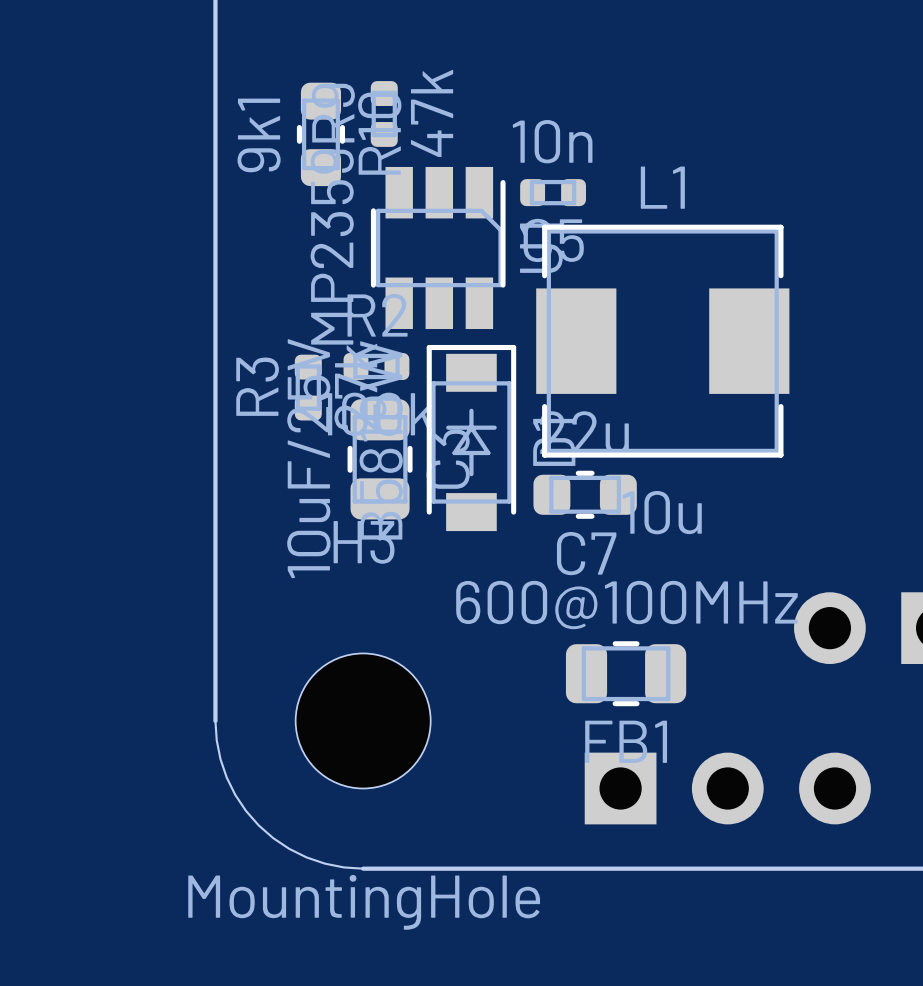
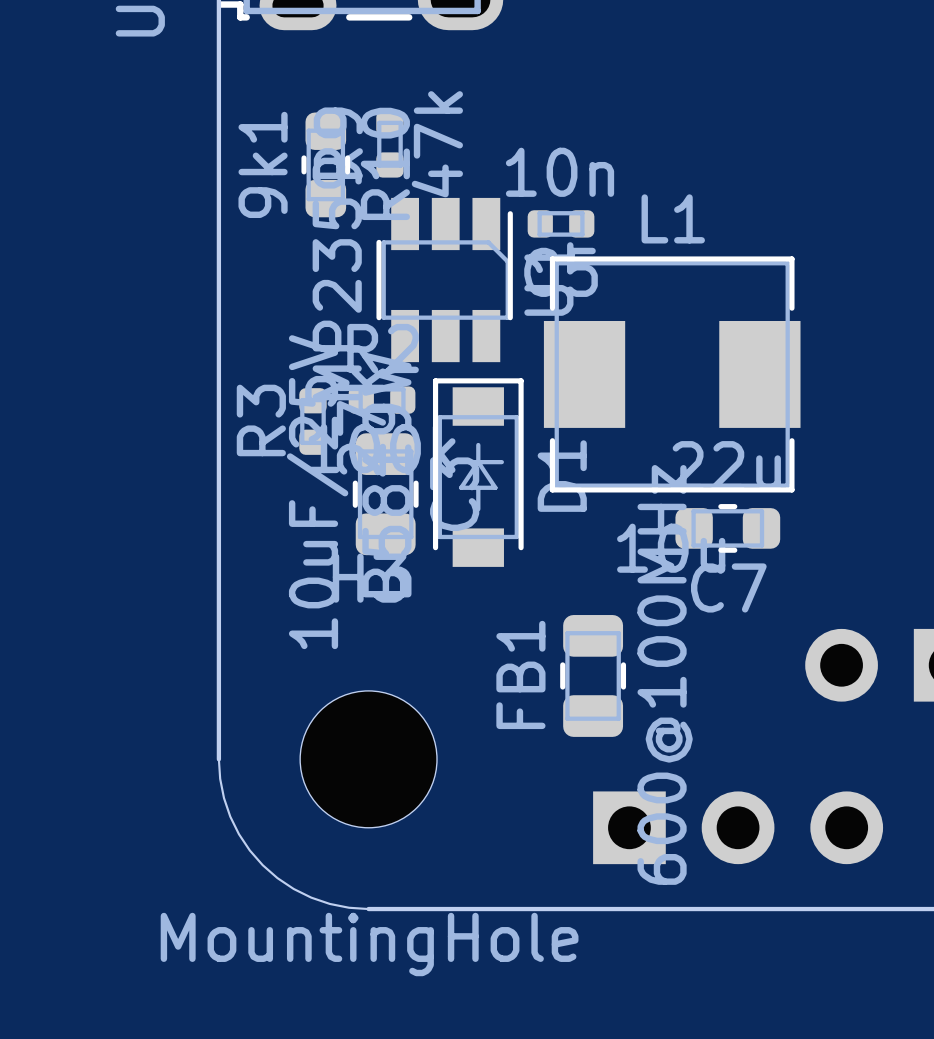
C7 position: (585, 494) -> (727, 528)
FB1 rotation: 0° (626, 673) -> 90° clockwise (593, 675)

